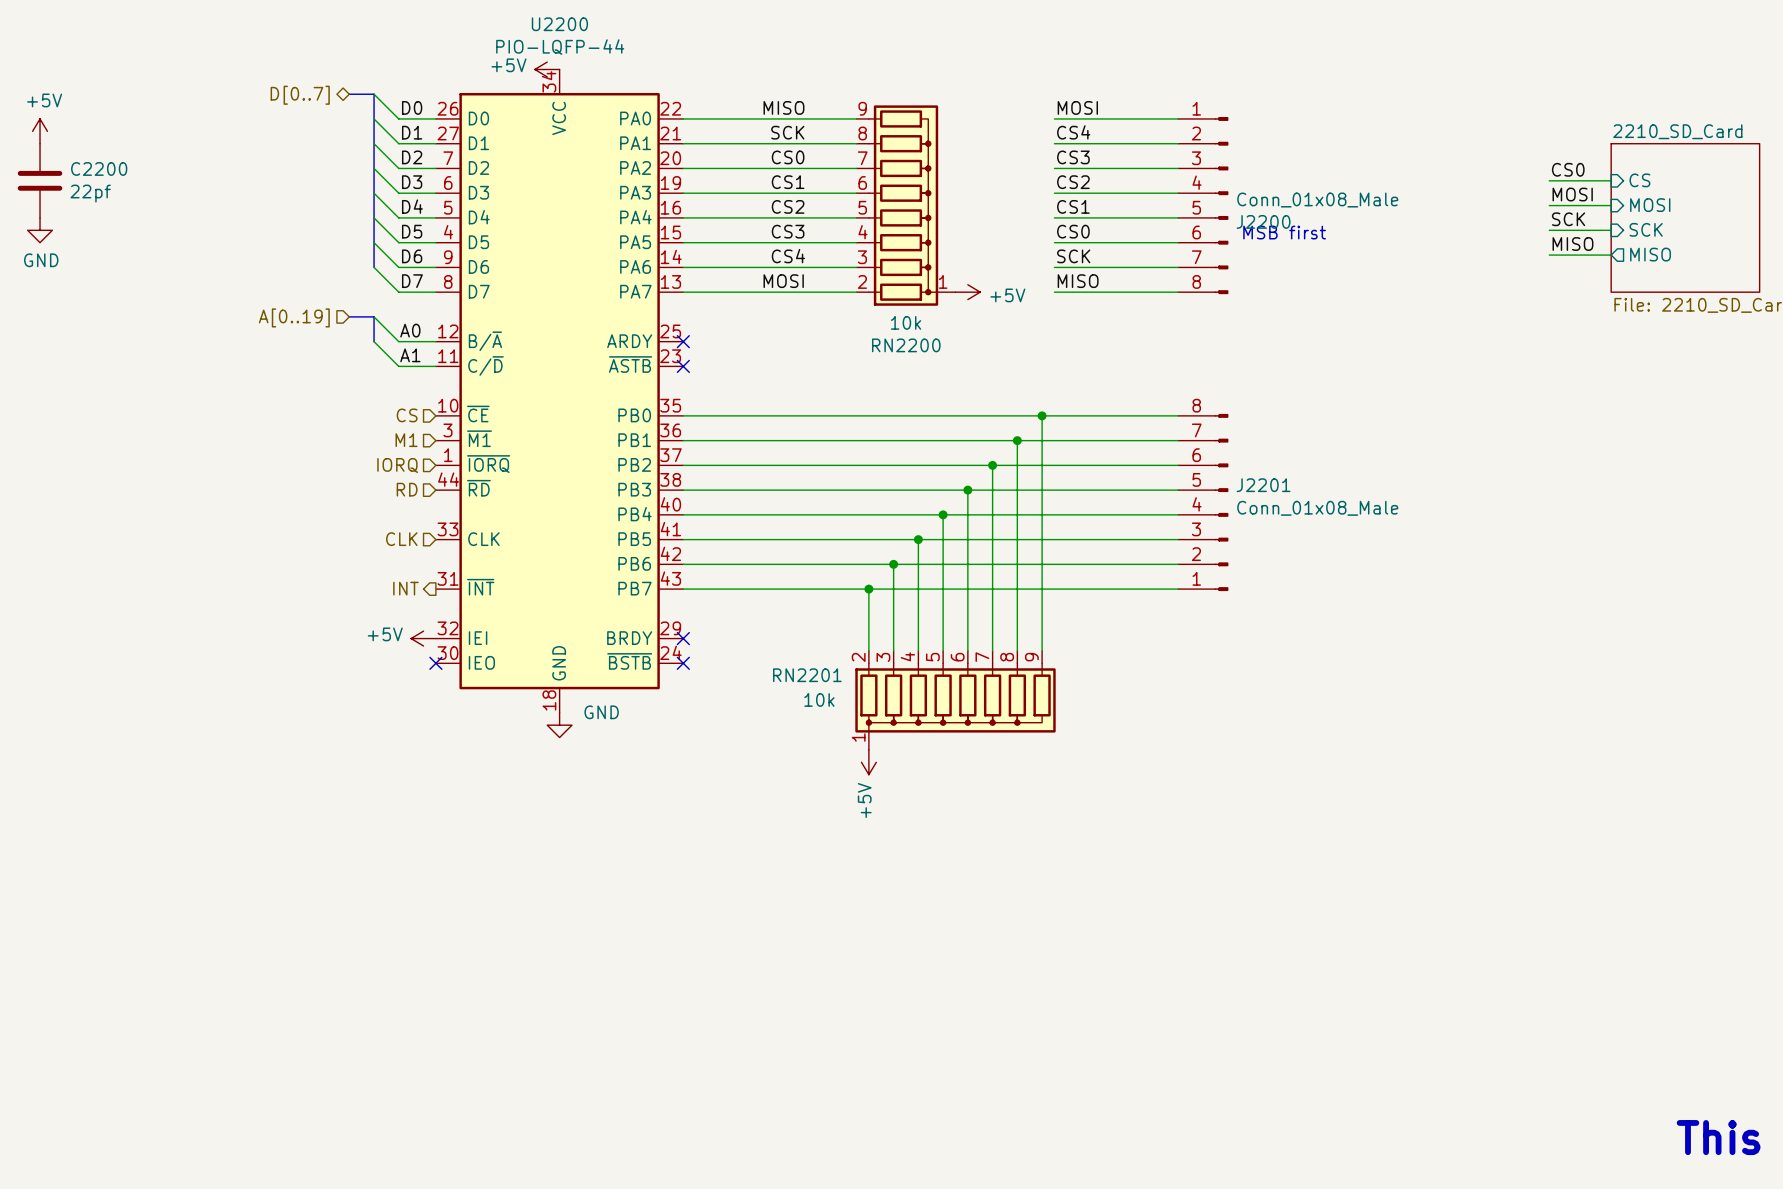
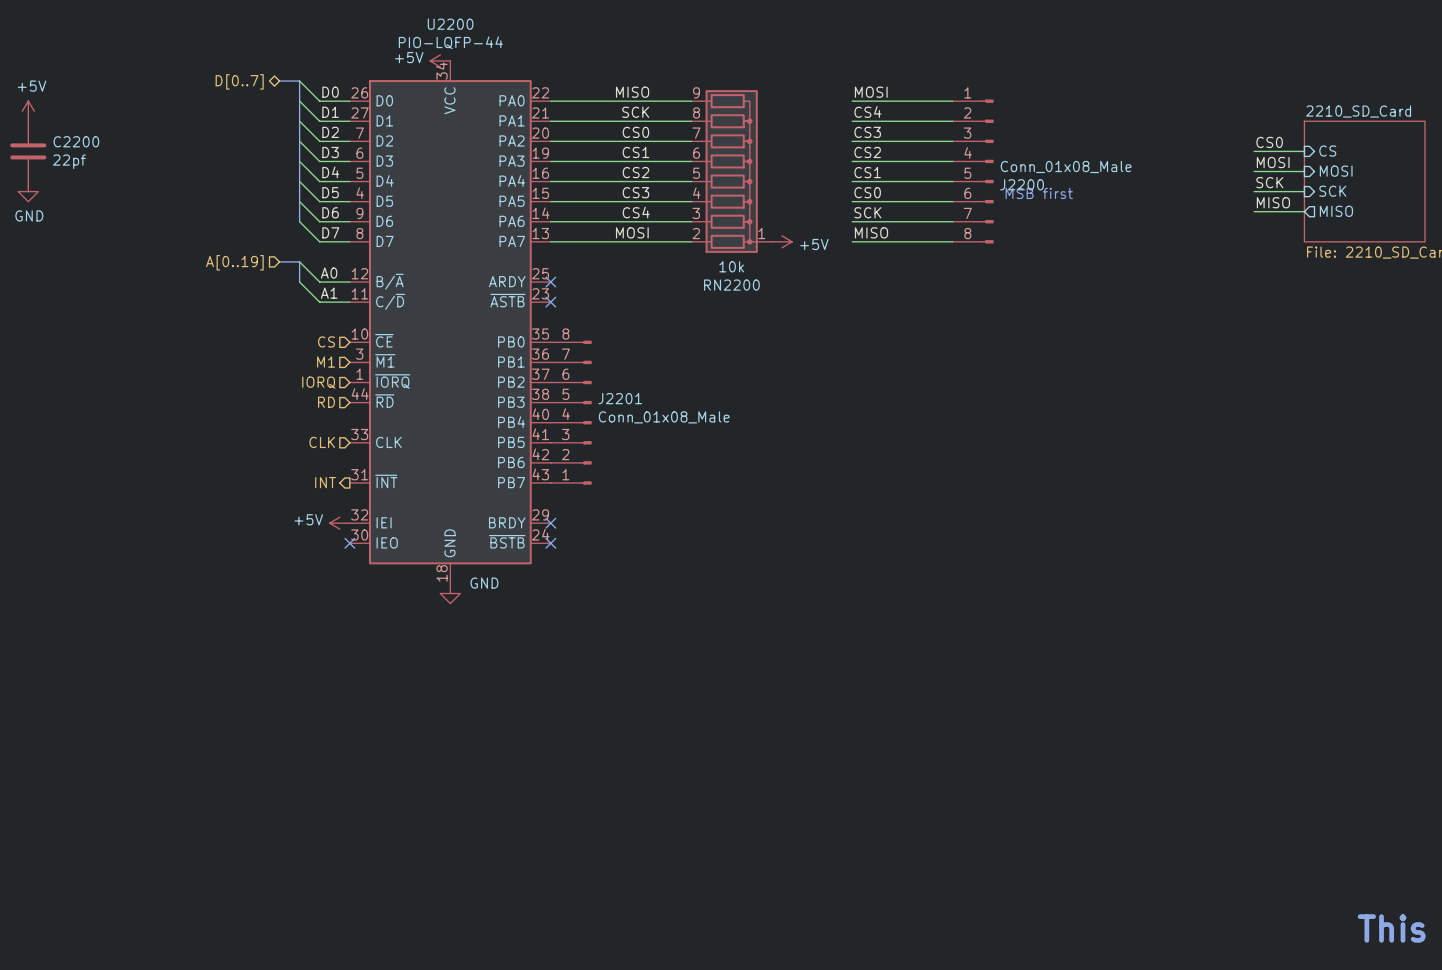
wire: (683, 415) (1178, 415) -> none
wire: (1042, 415) (1042, 650) -> none
junction: (1042, 415) -> none
wire: (683, 440) (1178, 440) -> none
wire: (1017, 440) (1017, 650) -> none
junction: (1017, 440) -> none
wire: (683, 465) (1178, 465) -> none
wire: (992, 465) (992, 650) -> none
junction: (992, 465) -> none
wire: (683, 490) (1178, 490) -> none
wire: (967, 490) (967, 650) -> none
junction: (967, 490) -> none
J2201 position: (1203, 502) -> (571, 412)
wire: (683, 514) (1178, 514) -> none
wire: (943, 514) (943, 650) -> none
junction: (943, 514) -> none
wire: (683, 539) (1178, 539) -> none
wire: (918, 539) (918, 650) -> none
junction: (918, 539) -> none
wire: (683, 564) (1178, 564) -> none
wire: (893, 564) (893, 650) -> none
junction: (893, 564) -> none
wire: (683, 589) (1178, 589) -> none
wire: (868, 589) (868, 650) -> none
junction: (868, 589) -> none
RN2201: 10k (955, 700) -> none
power symbol: +5V (868, 762) -> none

